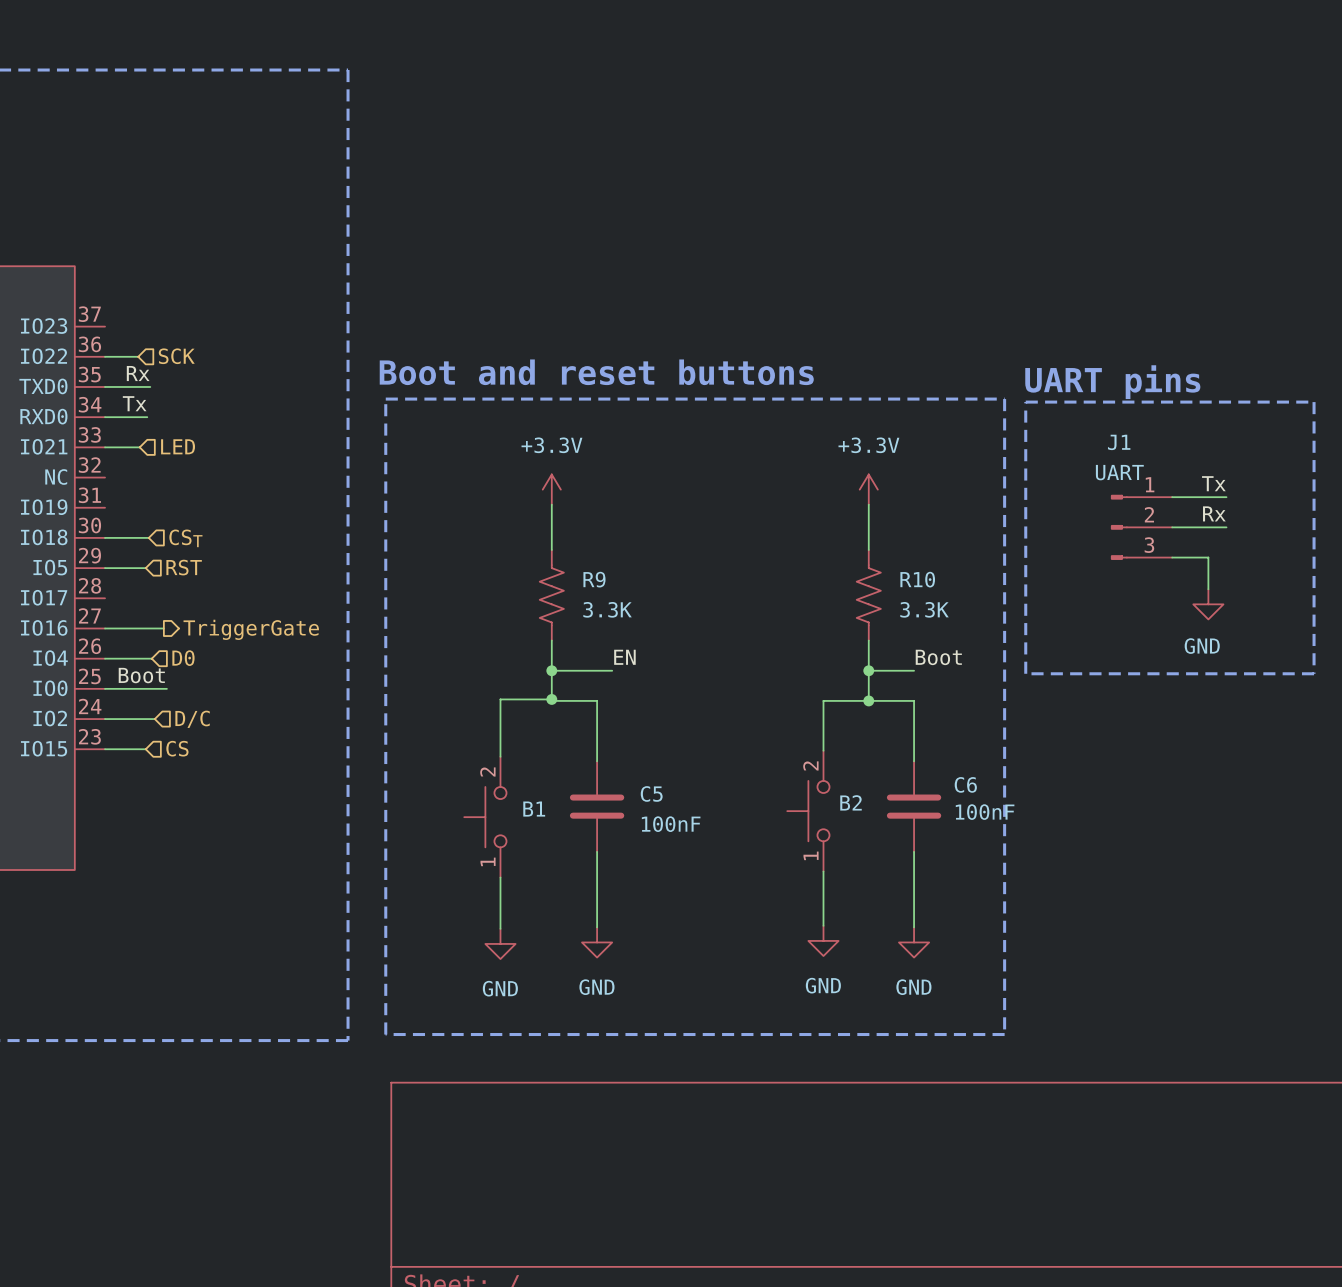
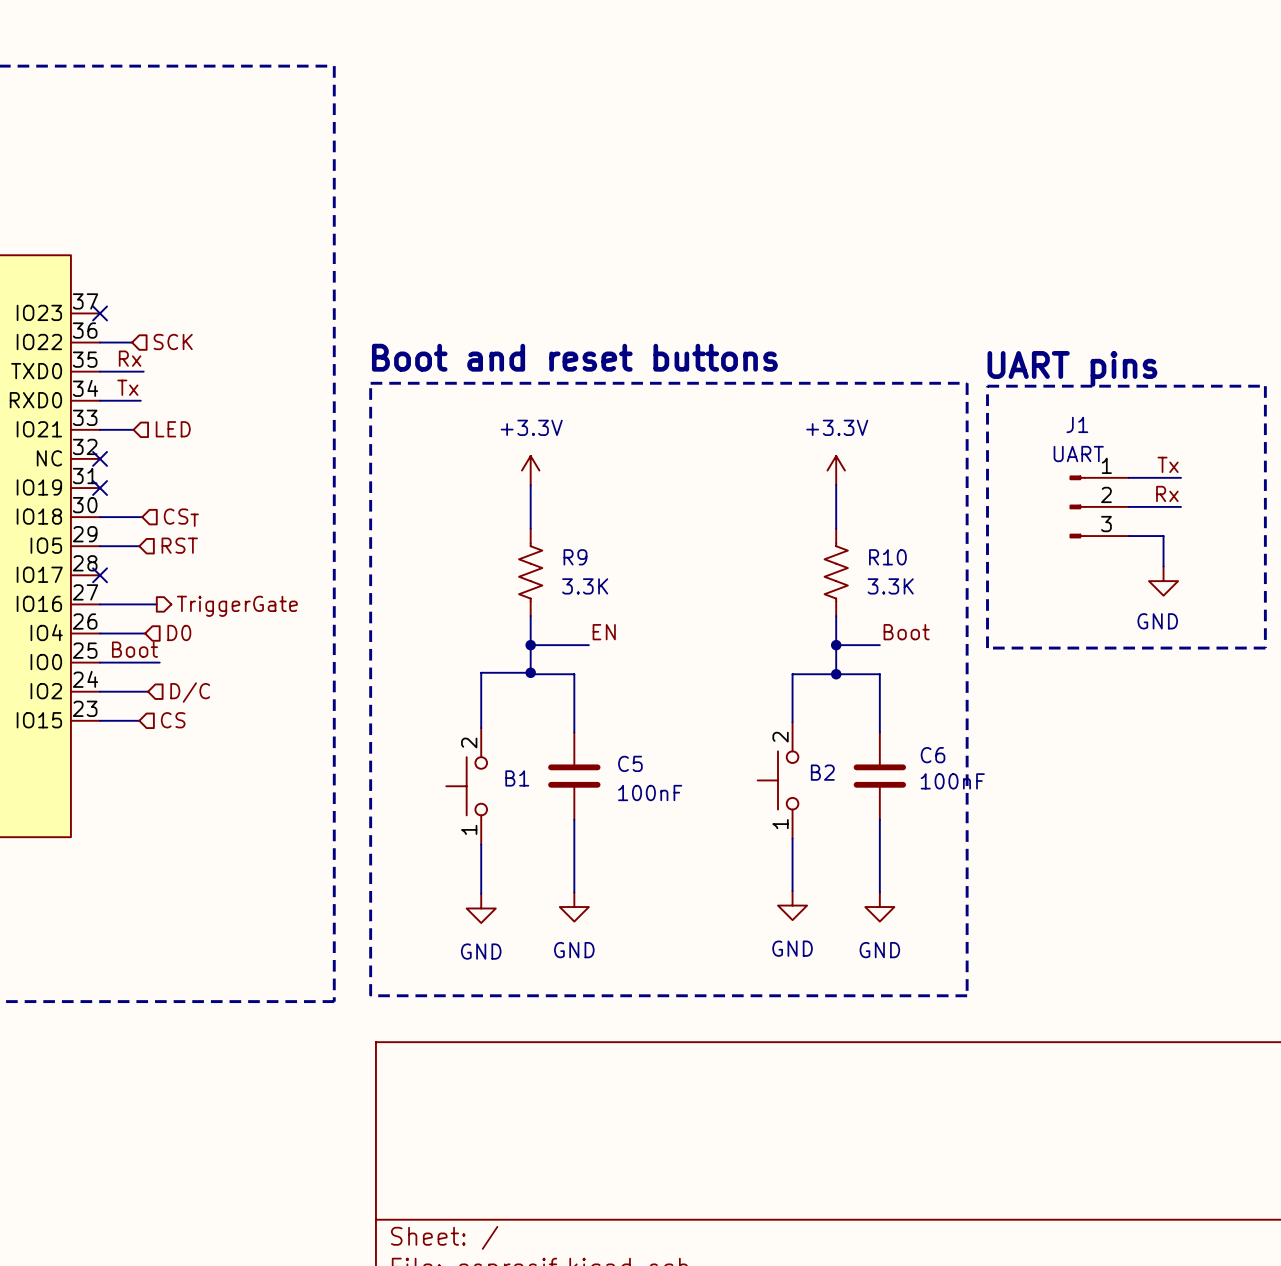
no-connect mark: none -> (100, 313)
no-connect mark: none -> (100, 458)
no-connect mark: none -> (100, 488)
no-connect mark: none -> (100, 575)

